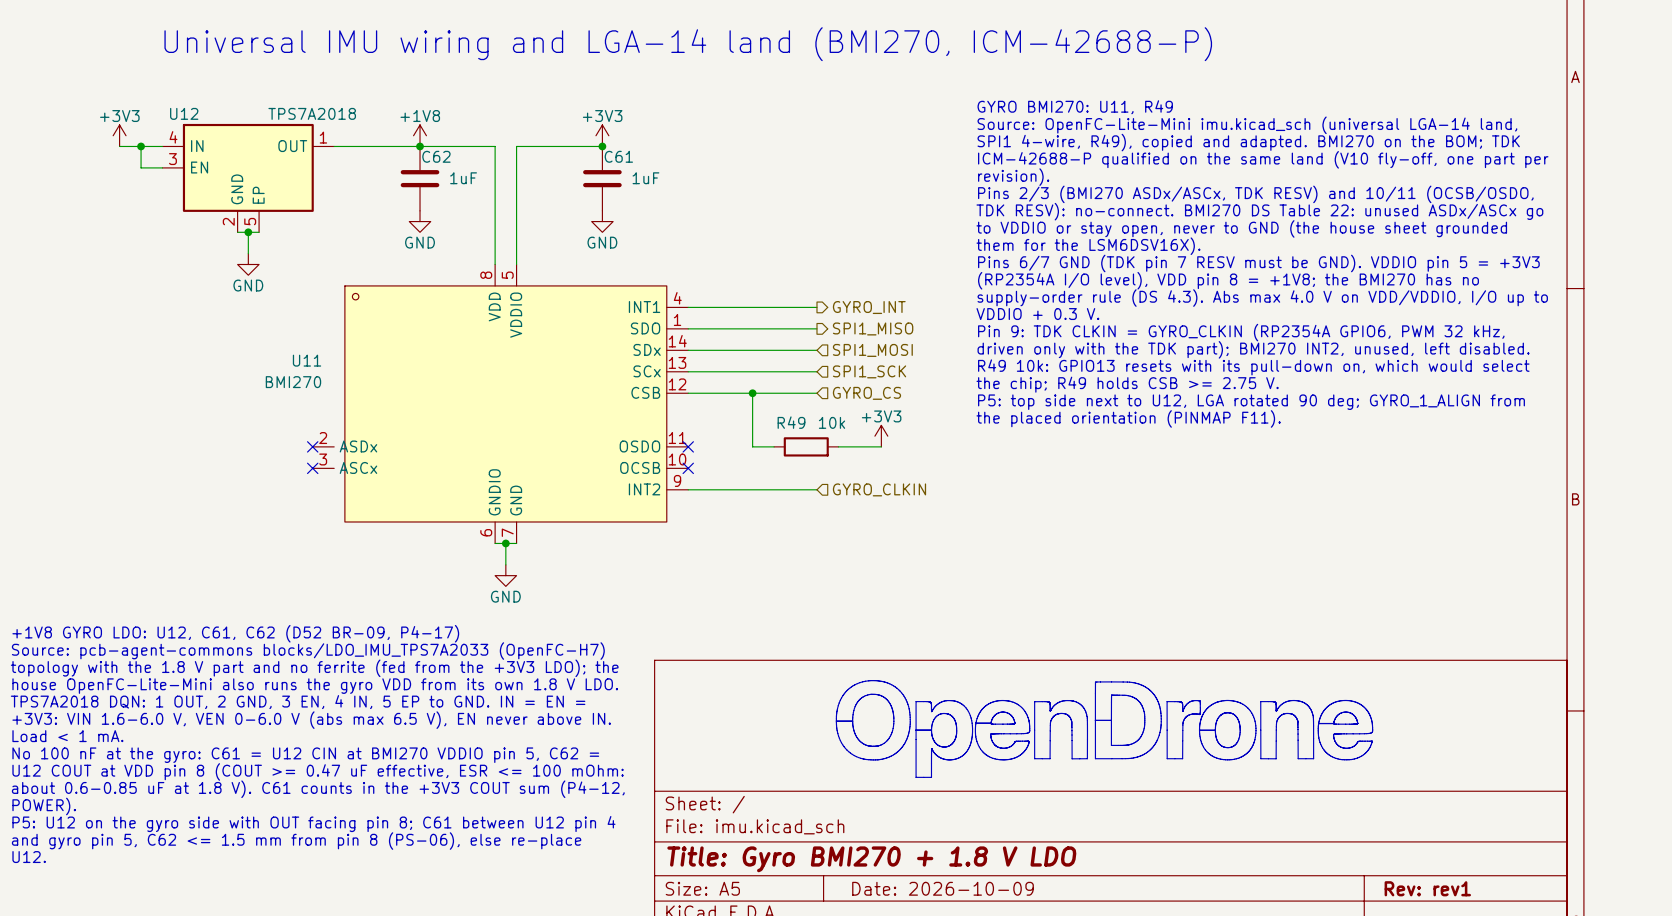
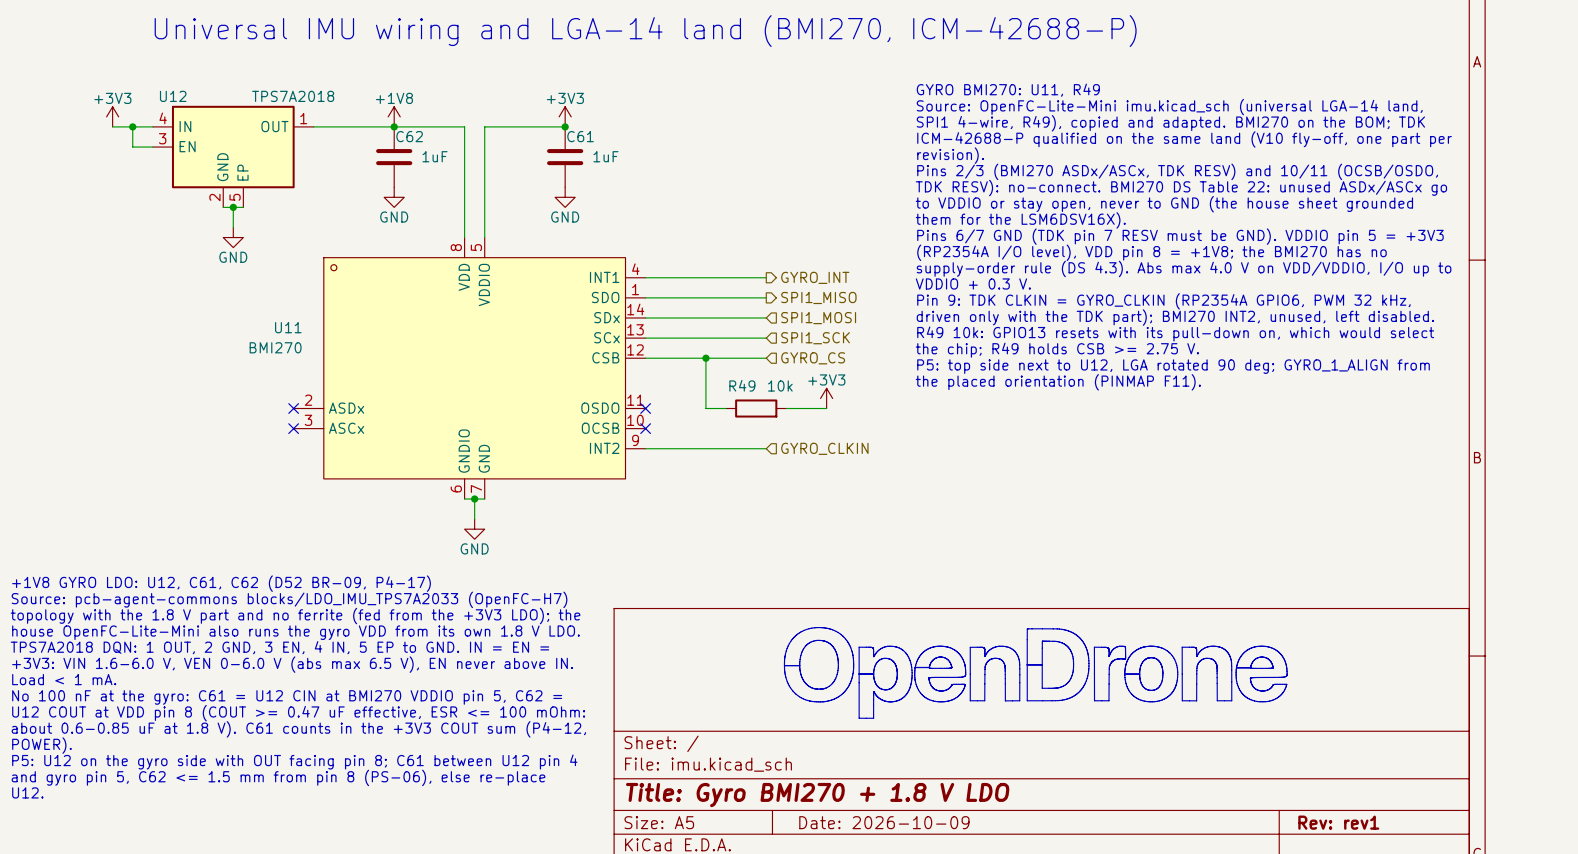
U11 symbol: [312, 264, 689, 544] -> [293, 237, 646, 500]

